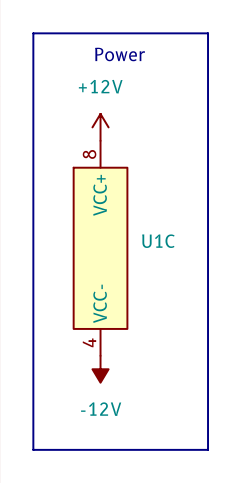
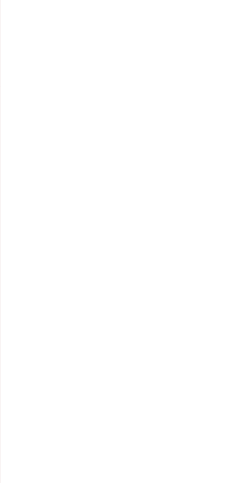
line: (33, 33) (208, 33) (208, 449) (33, 449) (33, 33) -> none
text: Power (120, 54) -> none
power symbol: +12V (100, 127) -> none
U1C: (100, 248) -> none
power symbol: -12V (100, 369) -> none

